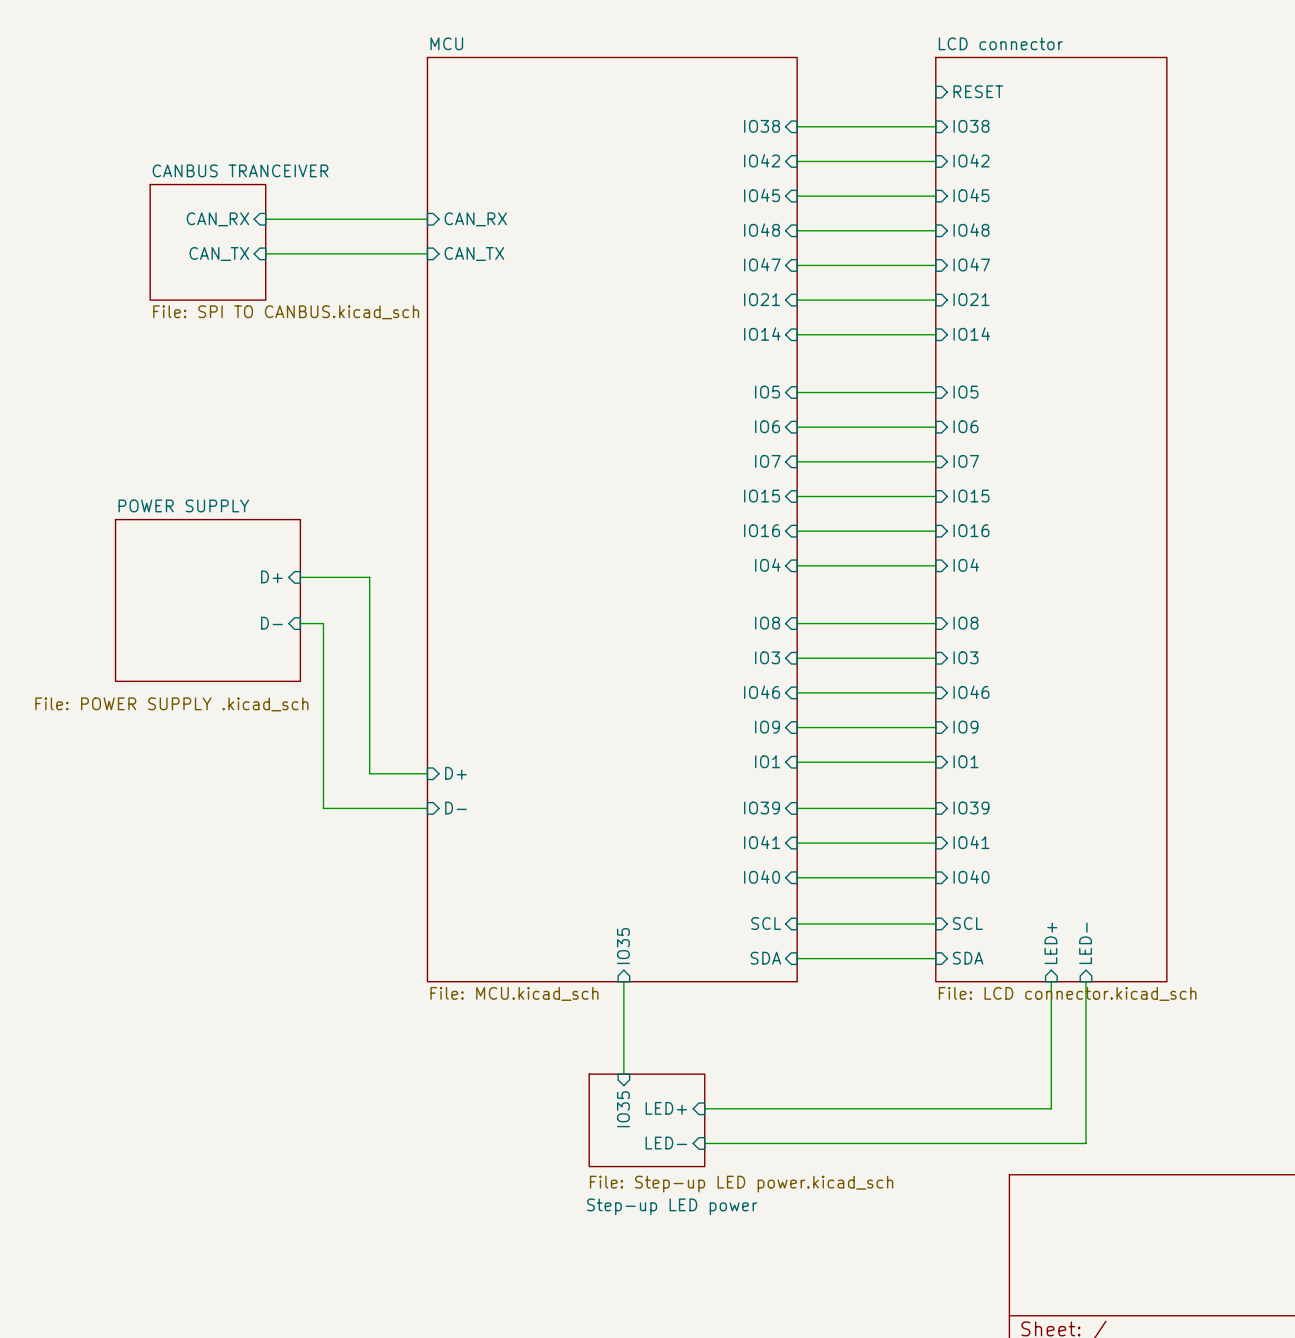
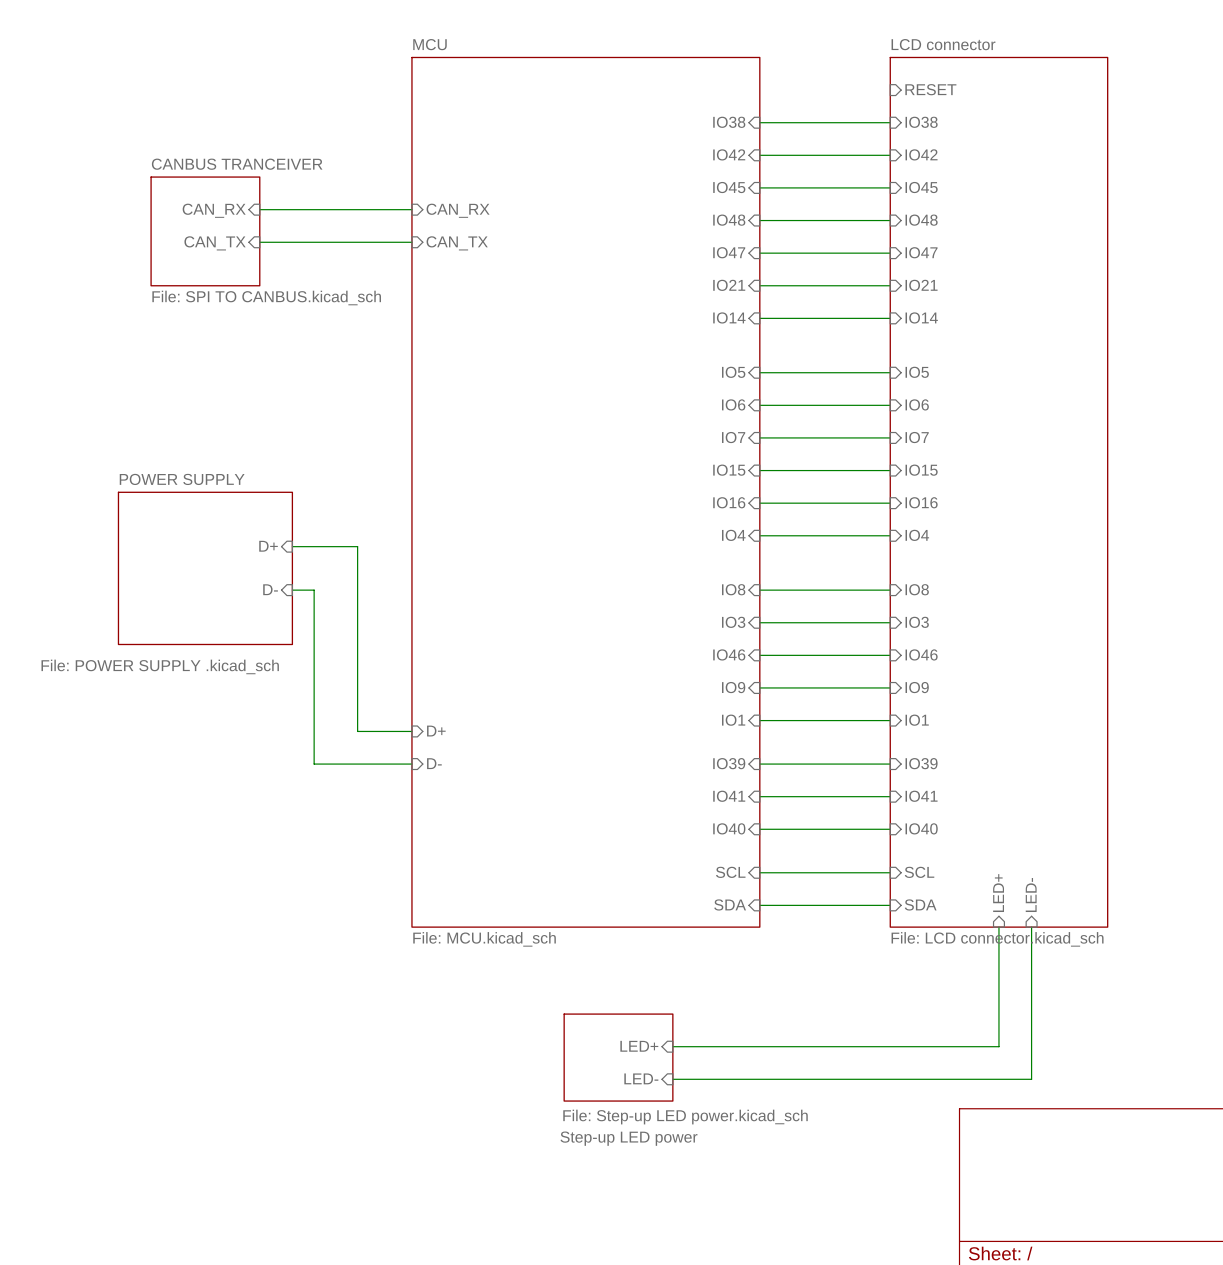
sheet pin: IO35 (623, 946) -> none
wire: (623, 981) (623, 1074) -> none
sheet pin: IO35 (623, 1109) -> none

